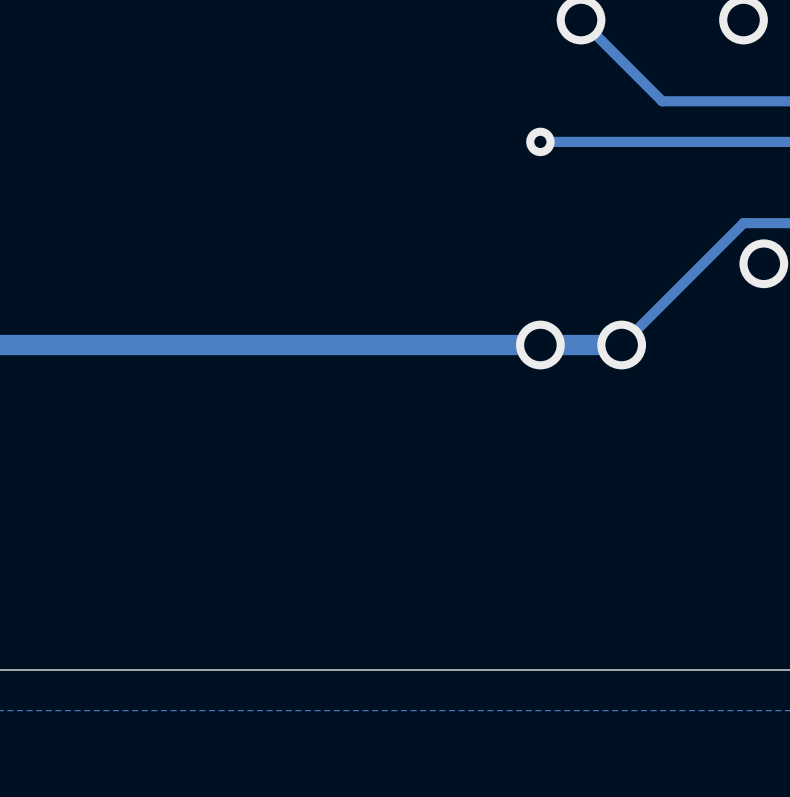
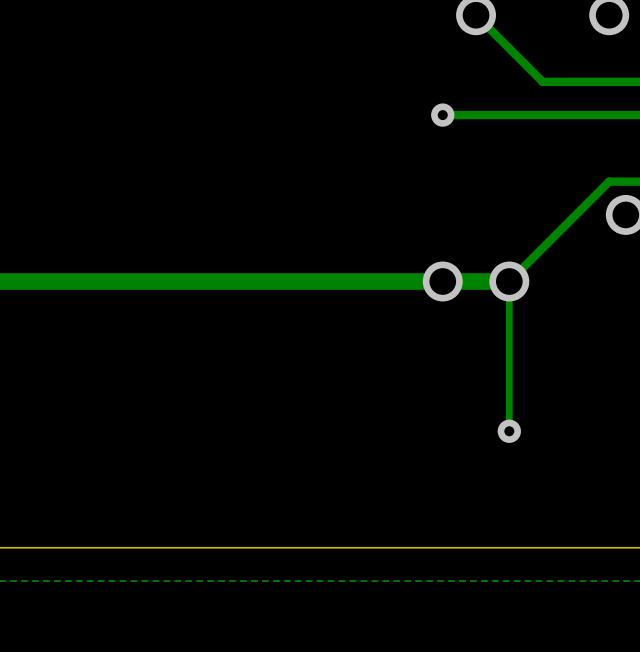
track: none -> (509, 281) (509, 431)
via: none -> (509, 431)

